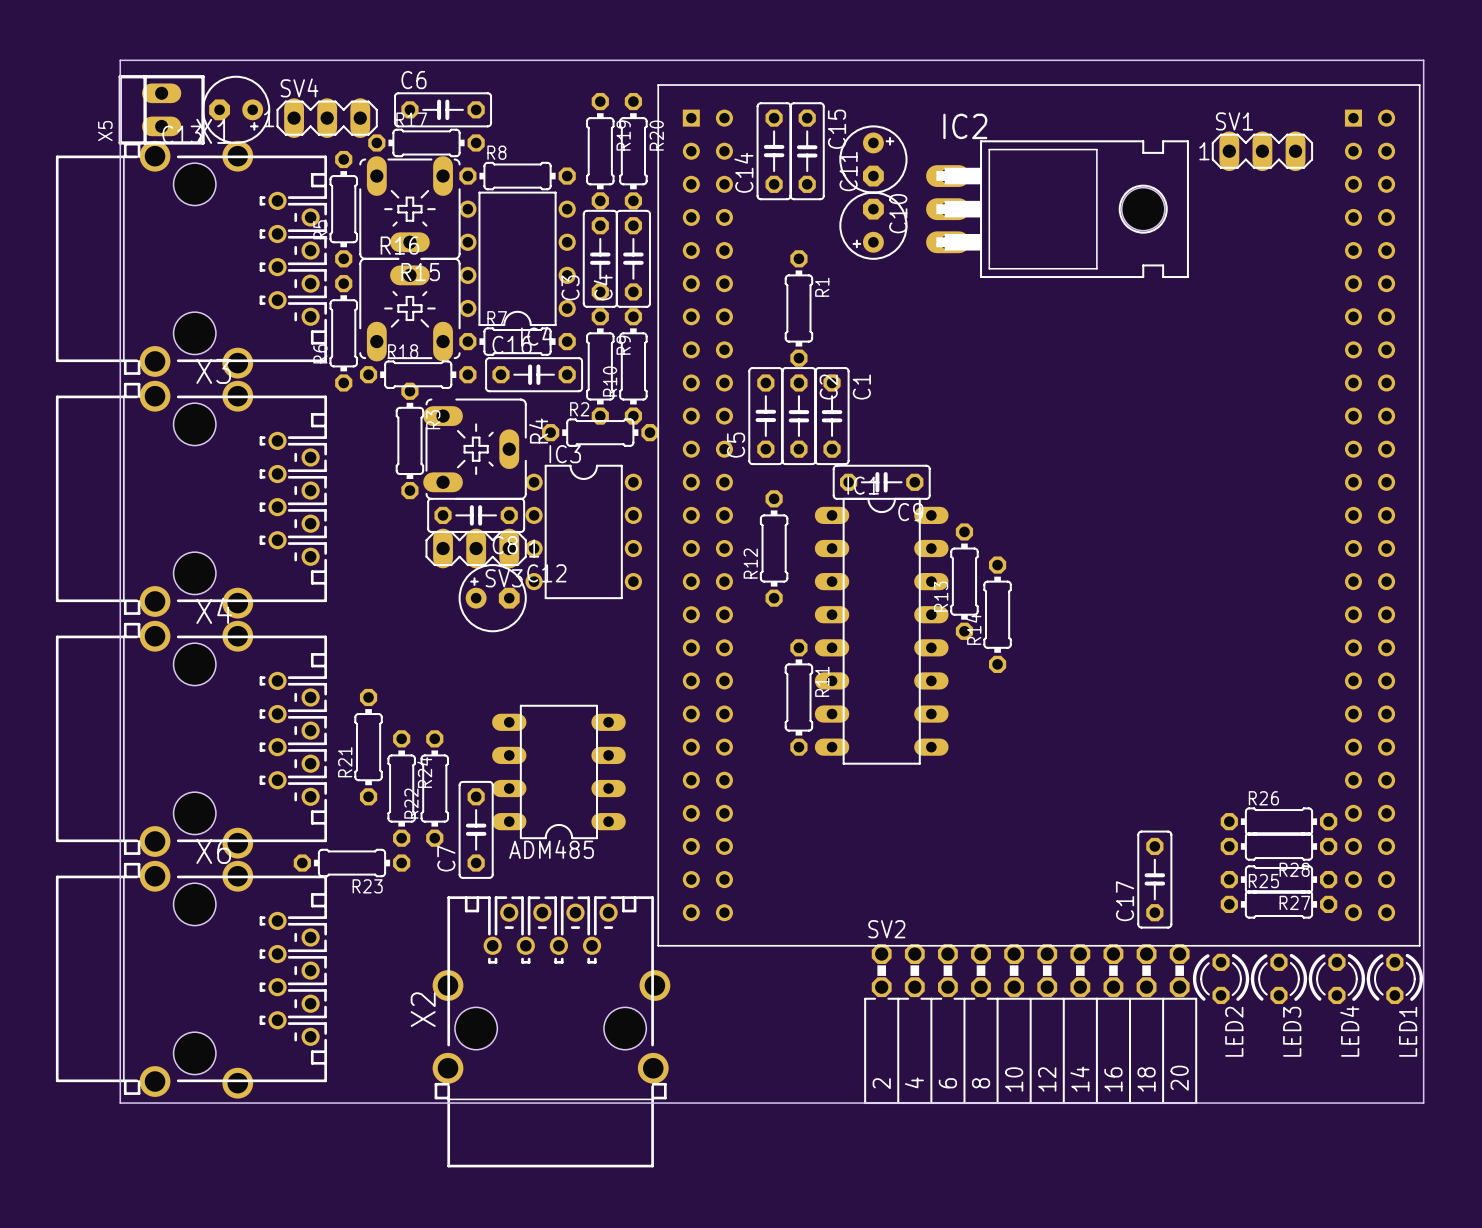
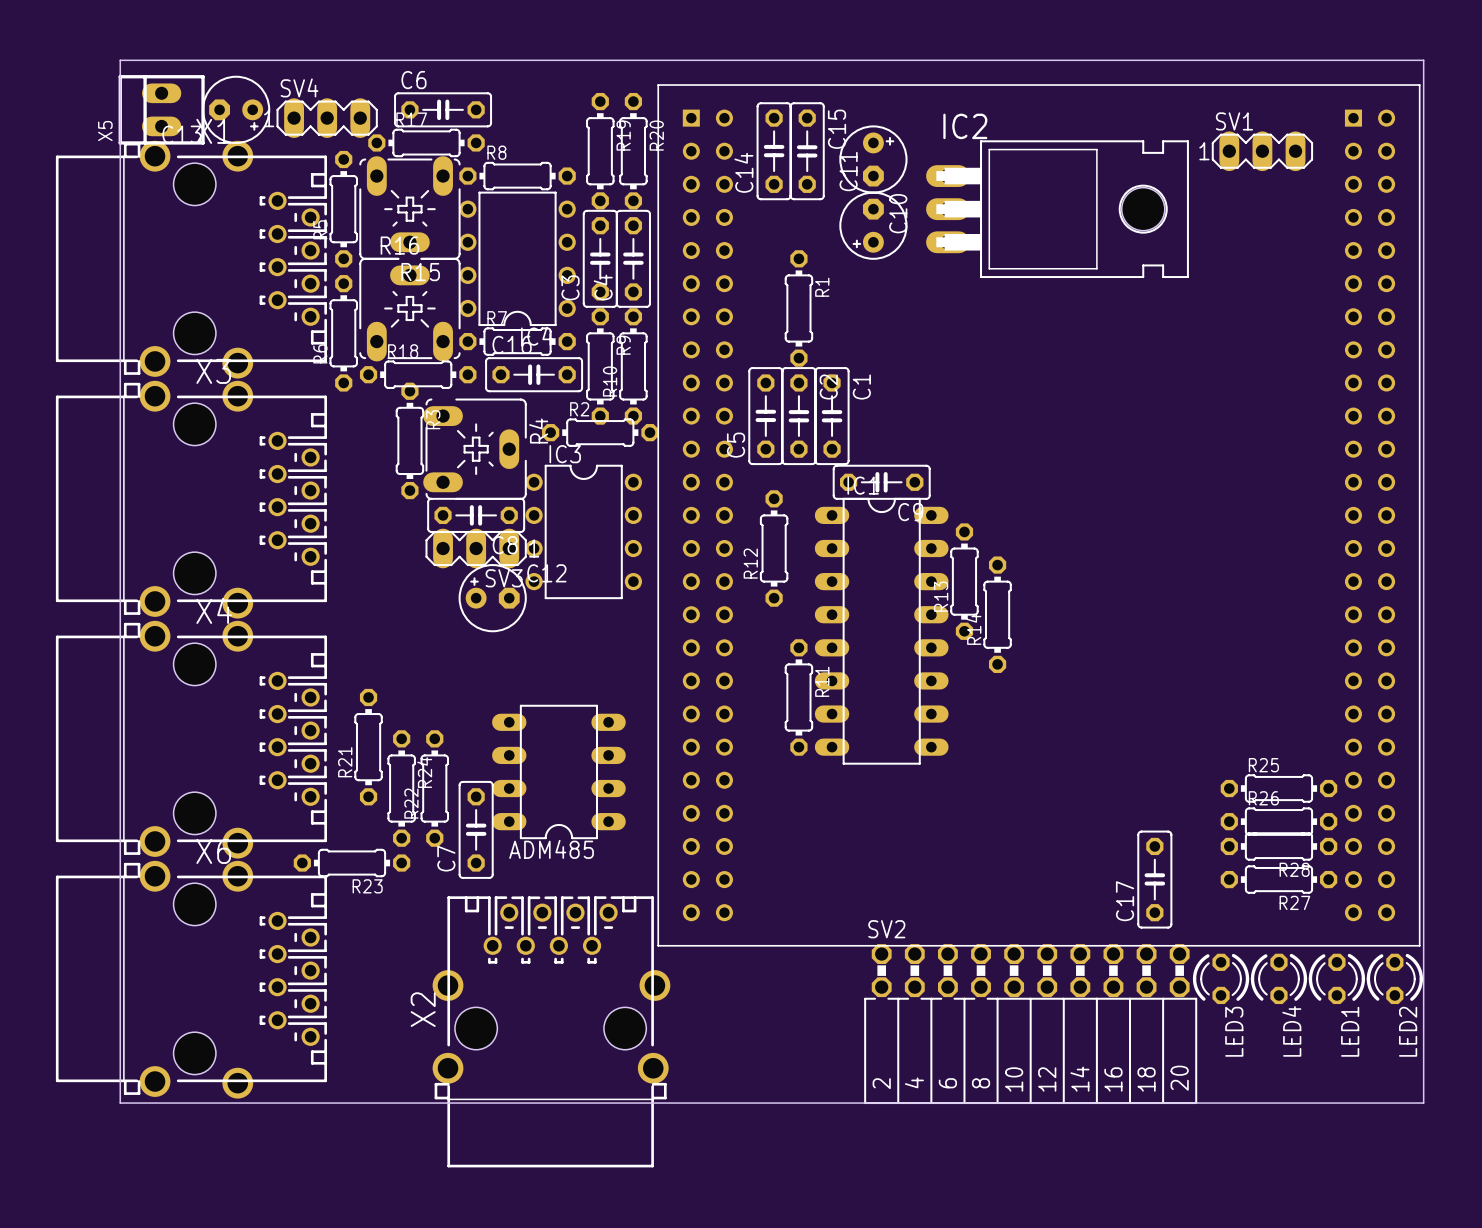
R25 position: (1278, 904) -> (1278, 788)
LED2 name: LED2 (1234, 1031) -> LED3 (1234, 1031)
LED3 name: LED3 (1292, 1031) -> LED4 (1291, 1031)
LED4 name: LED4 (1349, 1031) -> LED1 (1350, 1031)
LED1 name: LED1 (1408, 1031) -> LED2 (1408, 1031)

